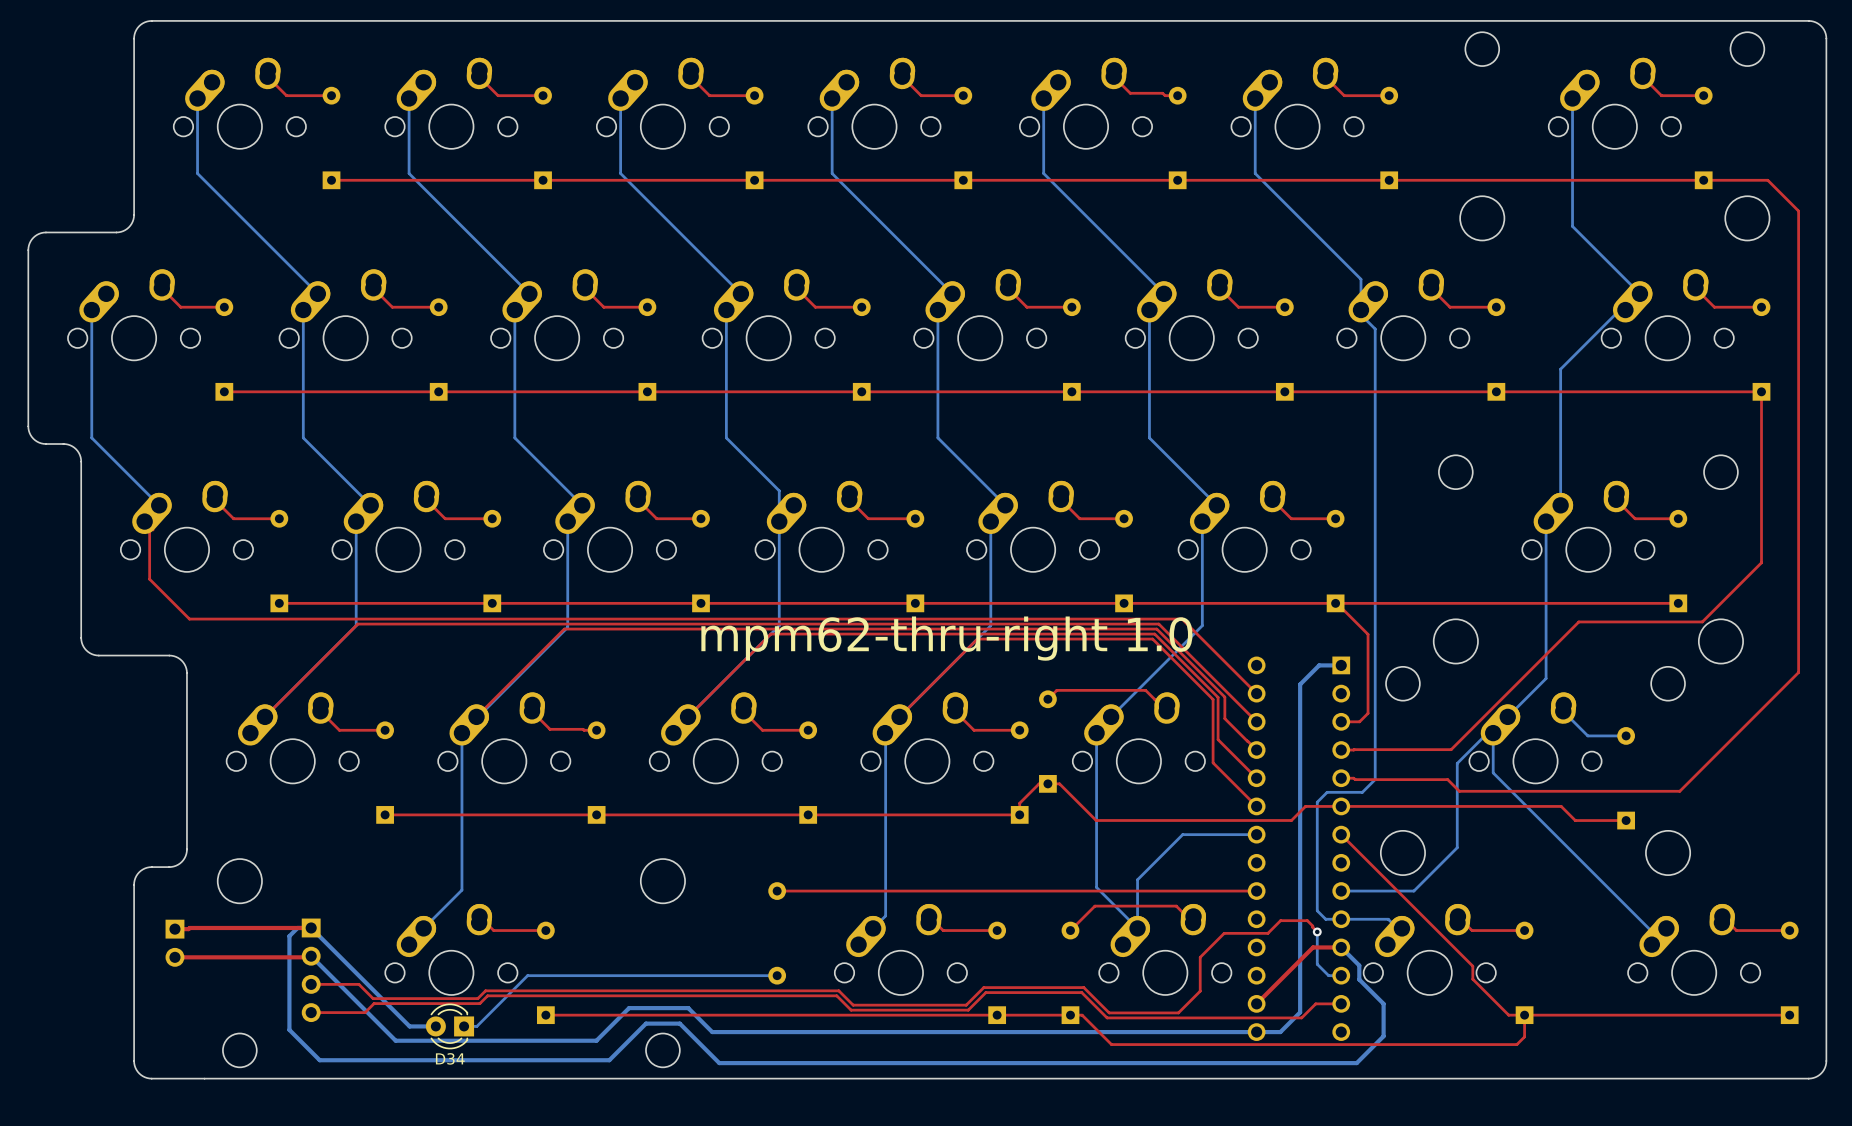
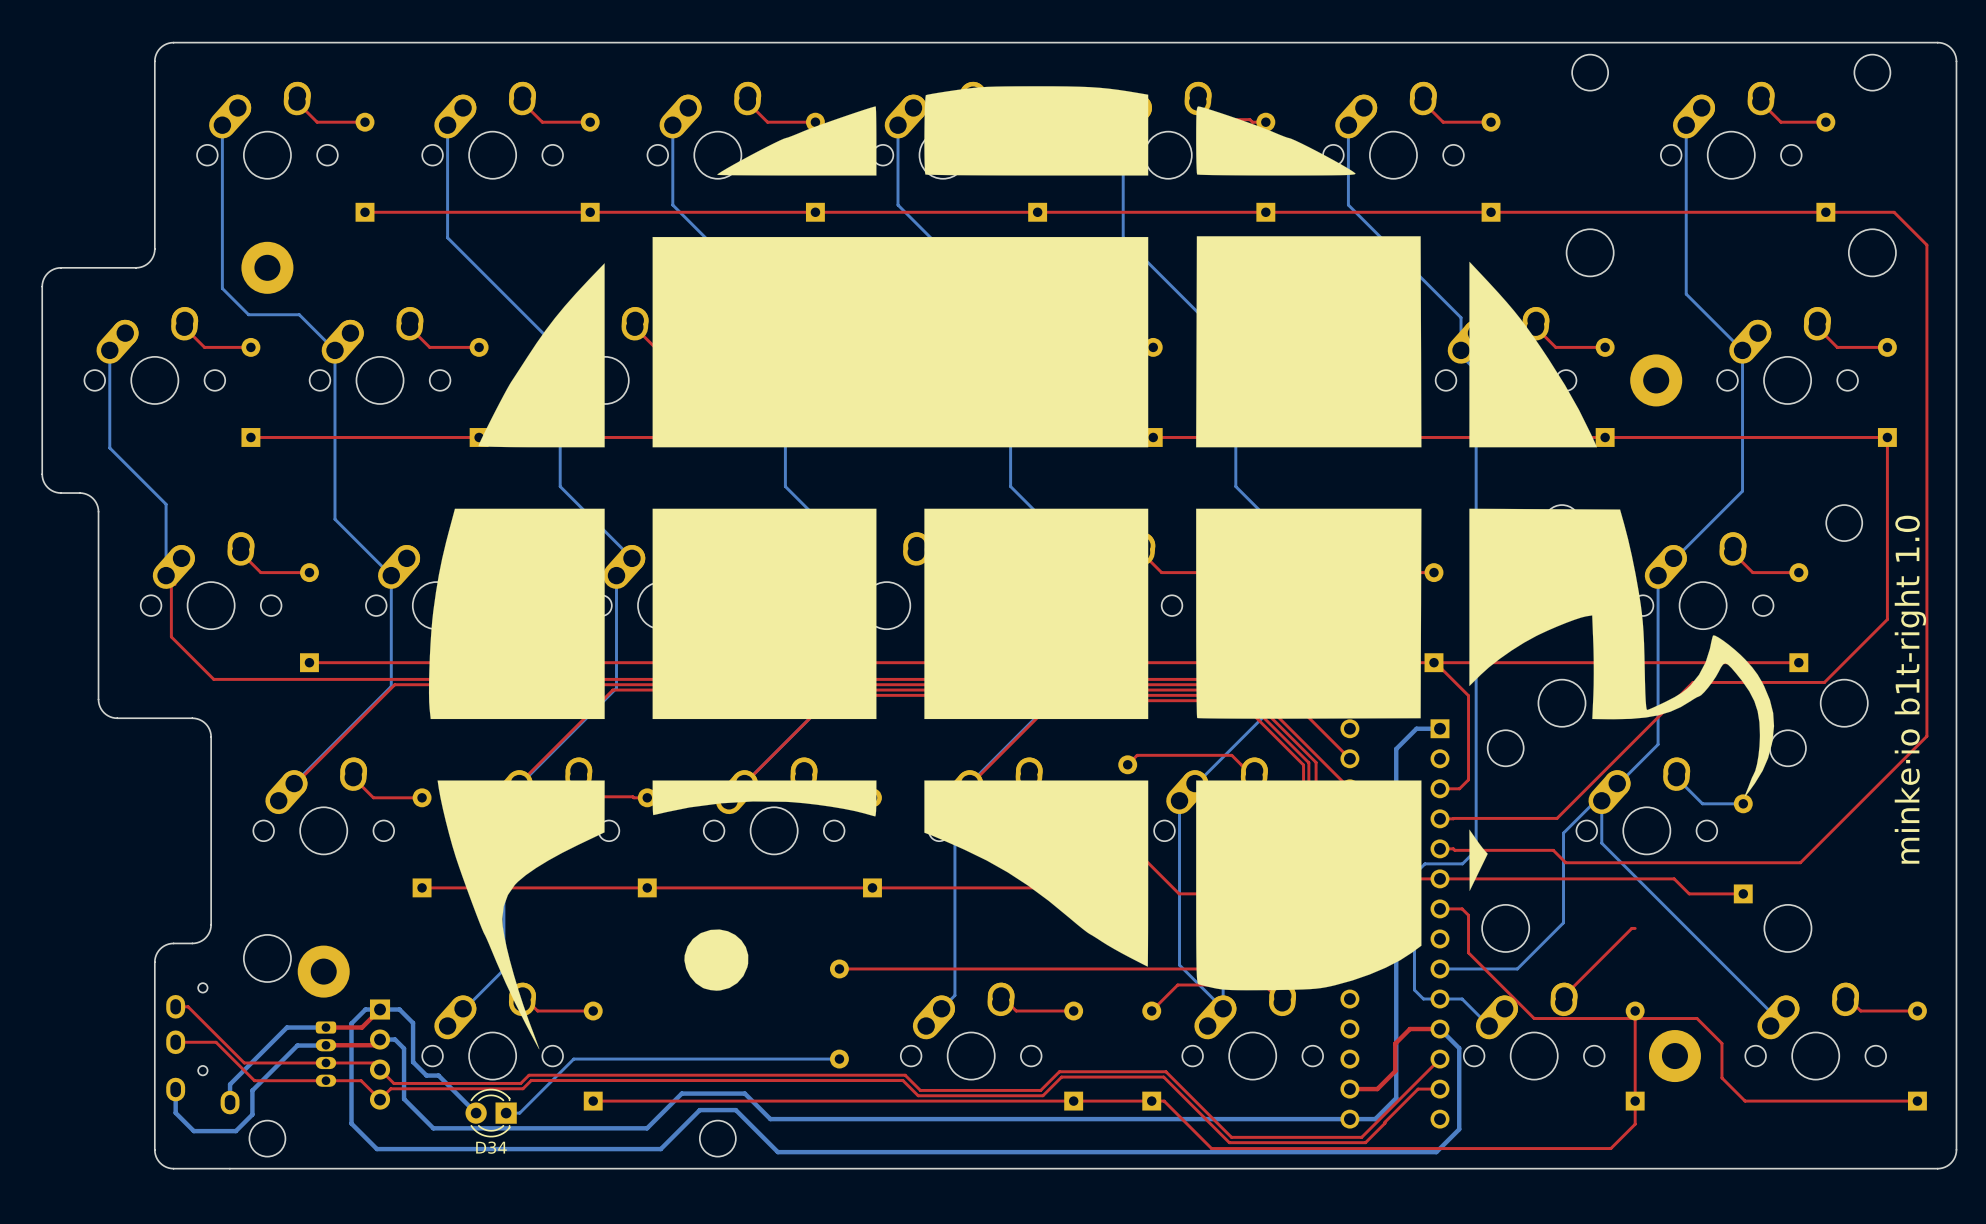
drawing: none -> [428, 86, 1775, 1050]
bottom track: (197, 173) (317, 293) -> (222, 205) (222, 288) (248, 314) (299, 314) (334, 350)
bottom track: (409, 173) (529, 293) -> (447, 205) (447, 237) (560, 350)
bottom track: (1043, 173) (1164, 293) -> (1123, 205) (1123, 237) (1235, 350)
bottom track: (1572, 226) (1639, 293) -> (1686, 261) (1686, 294) (1742, 350) (1742, 491) (1658, 575)
part: none -> (267, 267)
bottom track: (1625, 310) (1619, 310) (1560, 369) (1560, 505) -> none
part: none -> (1656, 380)
bottom track: (91, 401) (91, 437) (159, 505) -> (109, 447) (166, 504) (166, 575)
bottom track: (303, 437) (370, 505) -> (334, 486) (334, 519) (391, 575)
top track: (359, 624) (264, 716) -> (394, 684) (278, 800)
bottom track: (1202, 625) (1111, 716) -> (1292, 686) (1179, 800)
text: none -> minke·io b1t-right 1.0 (1910, 689)
text: mpm62-thru-right 1.0 (946, 638) -> none
top track: (979, 639) (899, 716) -> (1054, 700) (954, 800)
bottom track: (1546, 678) (1507, 716) -> (1658, 742) (1601, 800)
top track: (1341, 834) (1472, 966) (1472, 979) (1508, 1015) (1627, 1015) -> (1440, 908) (1462, 908) (1468, 915) (1468, 952) (1534, 1018) (1697, 1018) (1721, 1043) (1721, 1077) (1745, 1101)
bottom track: (461, 890) (423, 928) -> (503, 967) (447, 1026)
part: none -> (323, 971)
top track: (1457, 916) (1472, 930) (1524, 930) -> (1564, 995) (1631, 928) (1635, 928)
bottom track: (1362, 919) (1388, 919) (1397, 928) (1401, 928) -> (1462, 999) (1489, 1026)
top track: (311, 927) (174, 929) -> none
top track: none -> (380, 1009) (362, 1027) (325, 1027)
bottom track: (1317, 931) (1317, 964) (1328, 975) (1341, 975) -> none
top track: (1317, 931) (1307, 920) (1280, 920) (1267, 933) (1224, 933) (1200, 957) (1200, 991) (1178, 1012) (1109, 1012) -> (1440, 1059) (1361, 1137) (1231, 1137) (1192, 1098)
via: (1317, 931) -> none
top track: none -> (1635, 1018) (1635, 1101)
part: (174, 943) -> none
bottom track: none -> (325, 1027) (286, 1027) (230, 1084) (230, 1102)
bottom track: (311, 956) (368, 1013) -> (380, 1039) (395, 1039) (404, 1048) (404, 1098)
top track: (311, 956) (174, 957) -> none
top track: none -> (380, 1039) (374, 1045) (325, 1045)
top track: (1299, 961) (1256, 1003) -> (1395, 1043) (1395, 1071) (1377, 1089) (1349, 1089)
bottom track: none -> (325, 1045) (297, 1045) (252, 1090) (252, 1114) (235, 1131) (193, 1131) (175, 1112) (175, 1089)
part: none -> (202, 1048)
part position: (311, 970) -> (380, 1054)
part: none -> (325, 1054)
part: none -> (1674, 1056)
bottom track: (1359, 979) (1383, 1003) (1383, 1036) (1356, 1063) (1337, 1063) -> (1459, 1063) (1459, 1129) (1436, 1152)
top track: (311, 984) (358, 984) (373, 998) -> (175, 1006) (188, 1006) (244, 1062) (373, 1062) (393, 1083) (409, 1083)
top track: (374, 1003) (365, 1012) (311, 1012) -> (410, 1088) (390, 1088) (380, 1099) (361, 1080) (254, 1080) (216, 1042) (175, 1042)
top track: (1320, 1003) (1315, 1003) (1301, 1017) (1107, 1017) -> (1418, 1089) (1365, 1142) (1229, 1142) (1190, 1104)
bottom track: (435, 1026) (409, 1026) (311, 927) (297, 927) (289, 936) (289, 1029) (319, 1060) (342, 1060) -> (476, 1113) (438, 1075) (426, 1075) (413, 1062) (413, 1023) (399, 1009) (365, 1009) (351, 1023) (351, 1123) (376, 1149)
top track: (1111, 1044) (1516, 1044) -> (1195, 1132) (1211, 1148) (1610, 1148) (1627, 1132)

